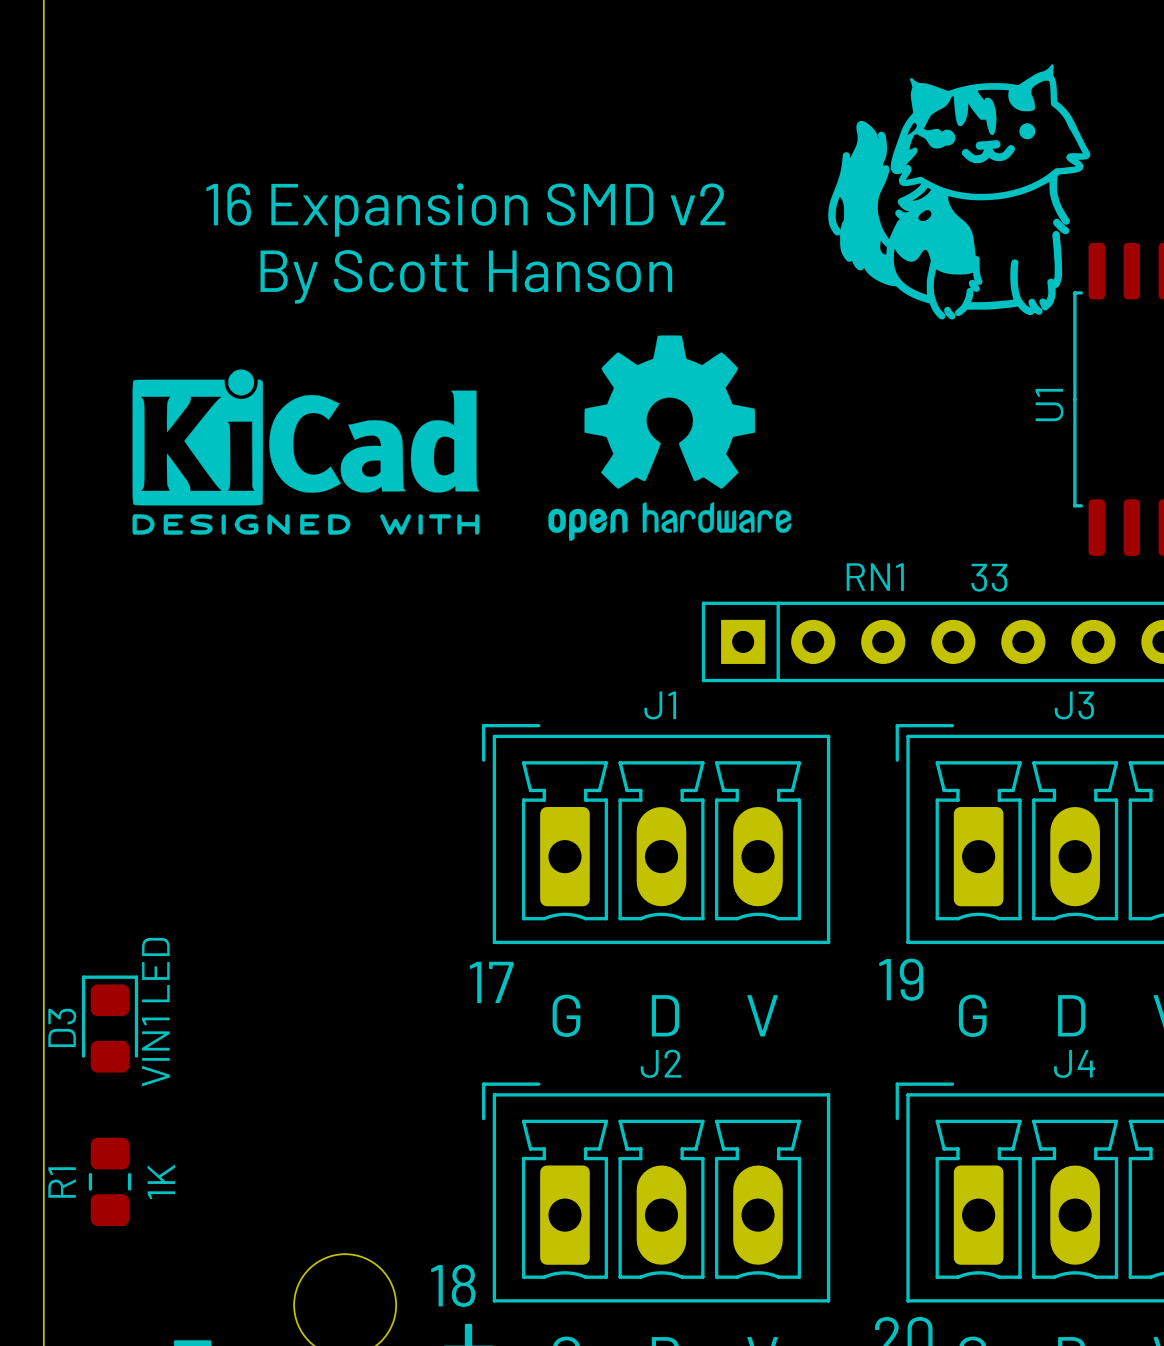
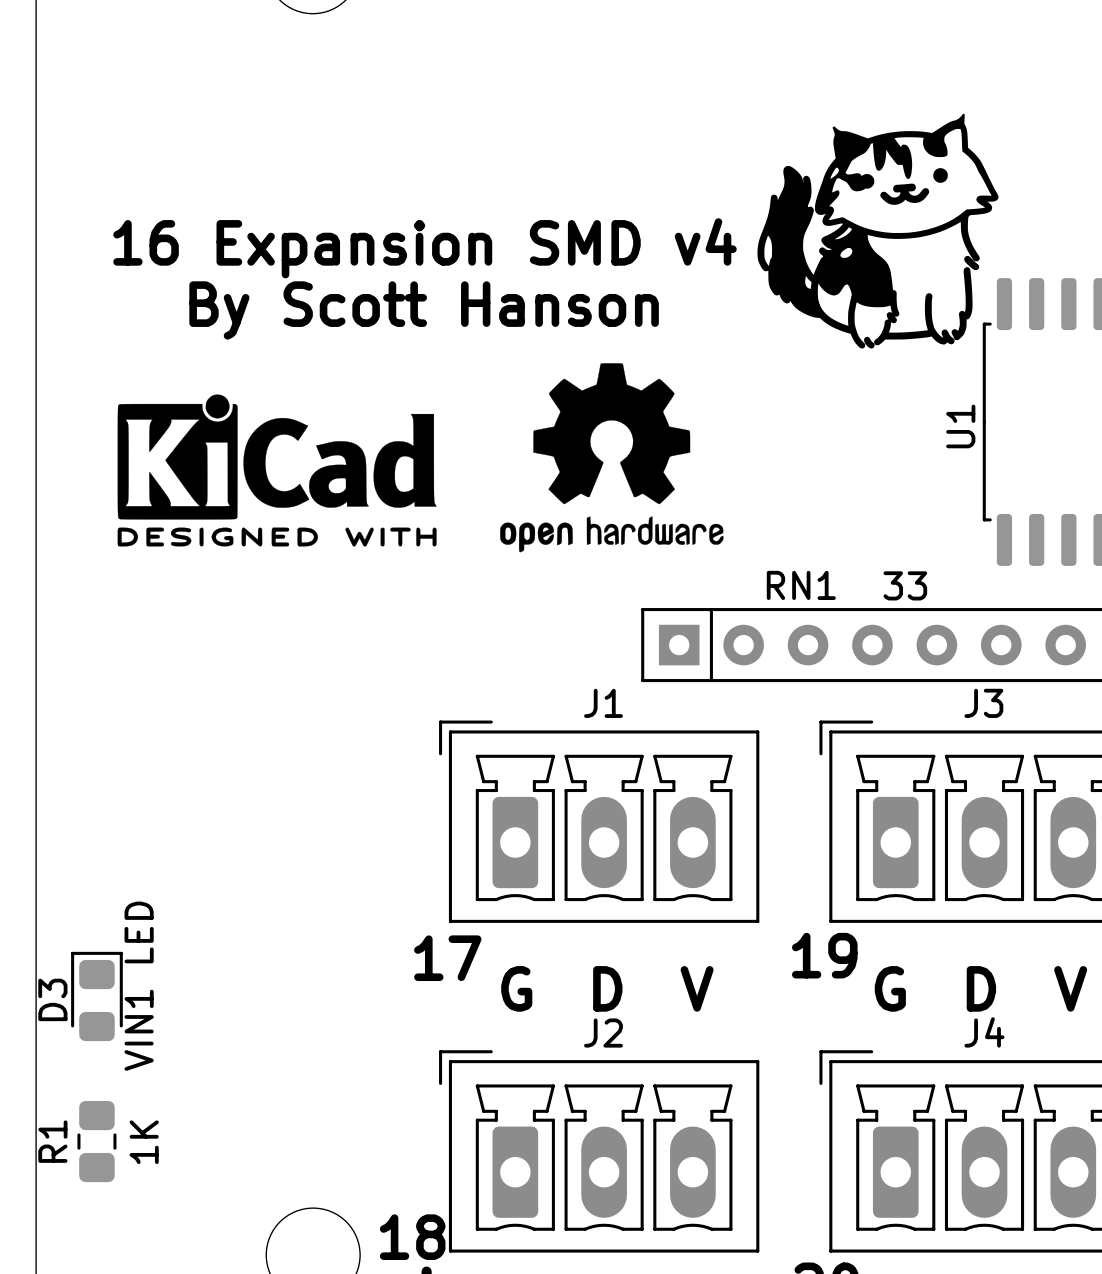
text: 16 Expansion SMD v2 (465, 210) -> 16 Expansion SMD v4 (425, 248)

